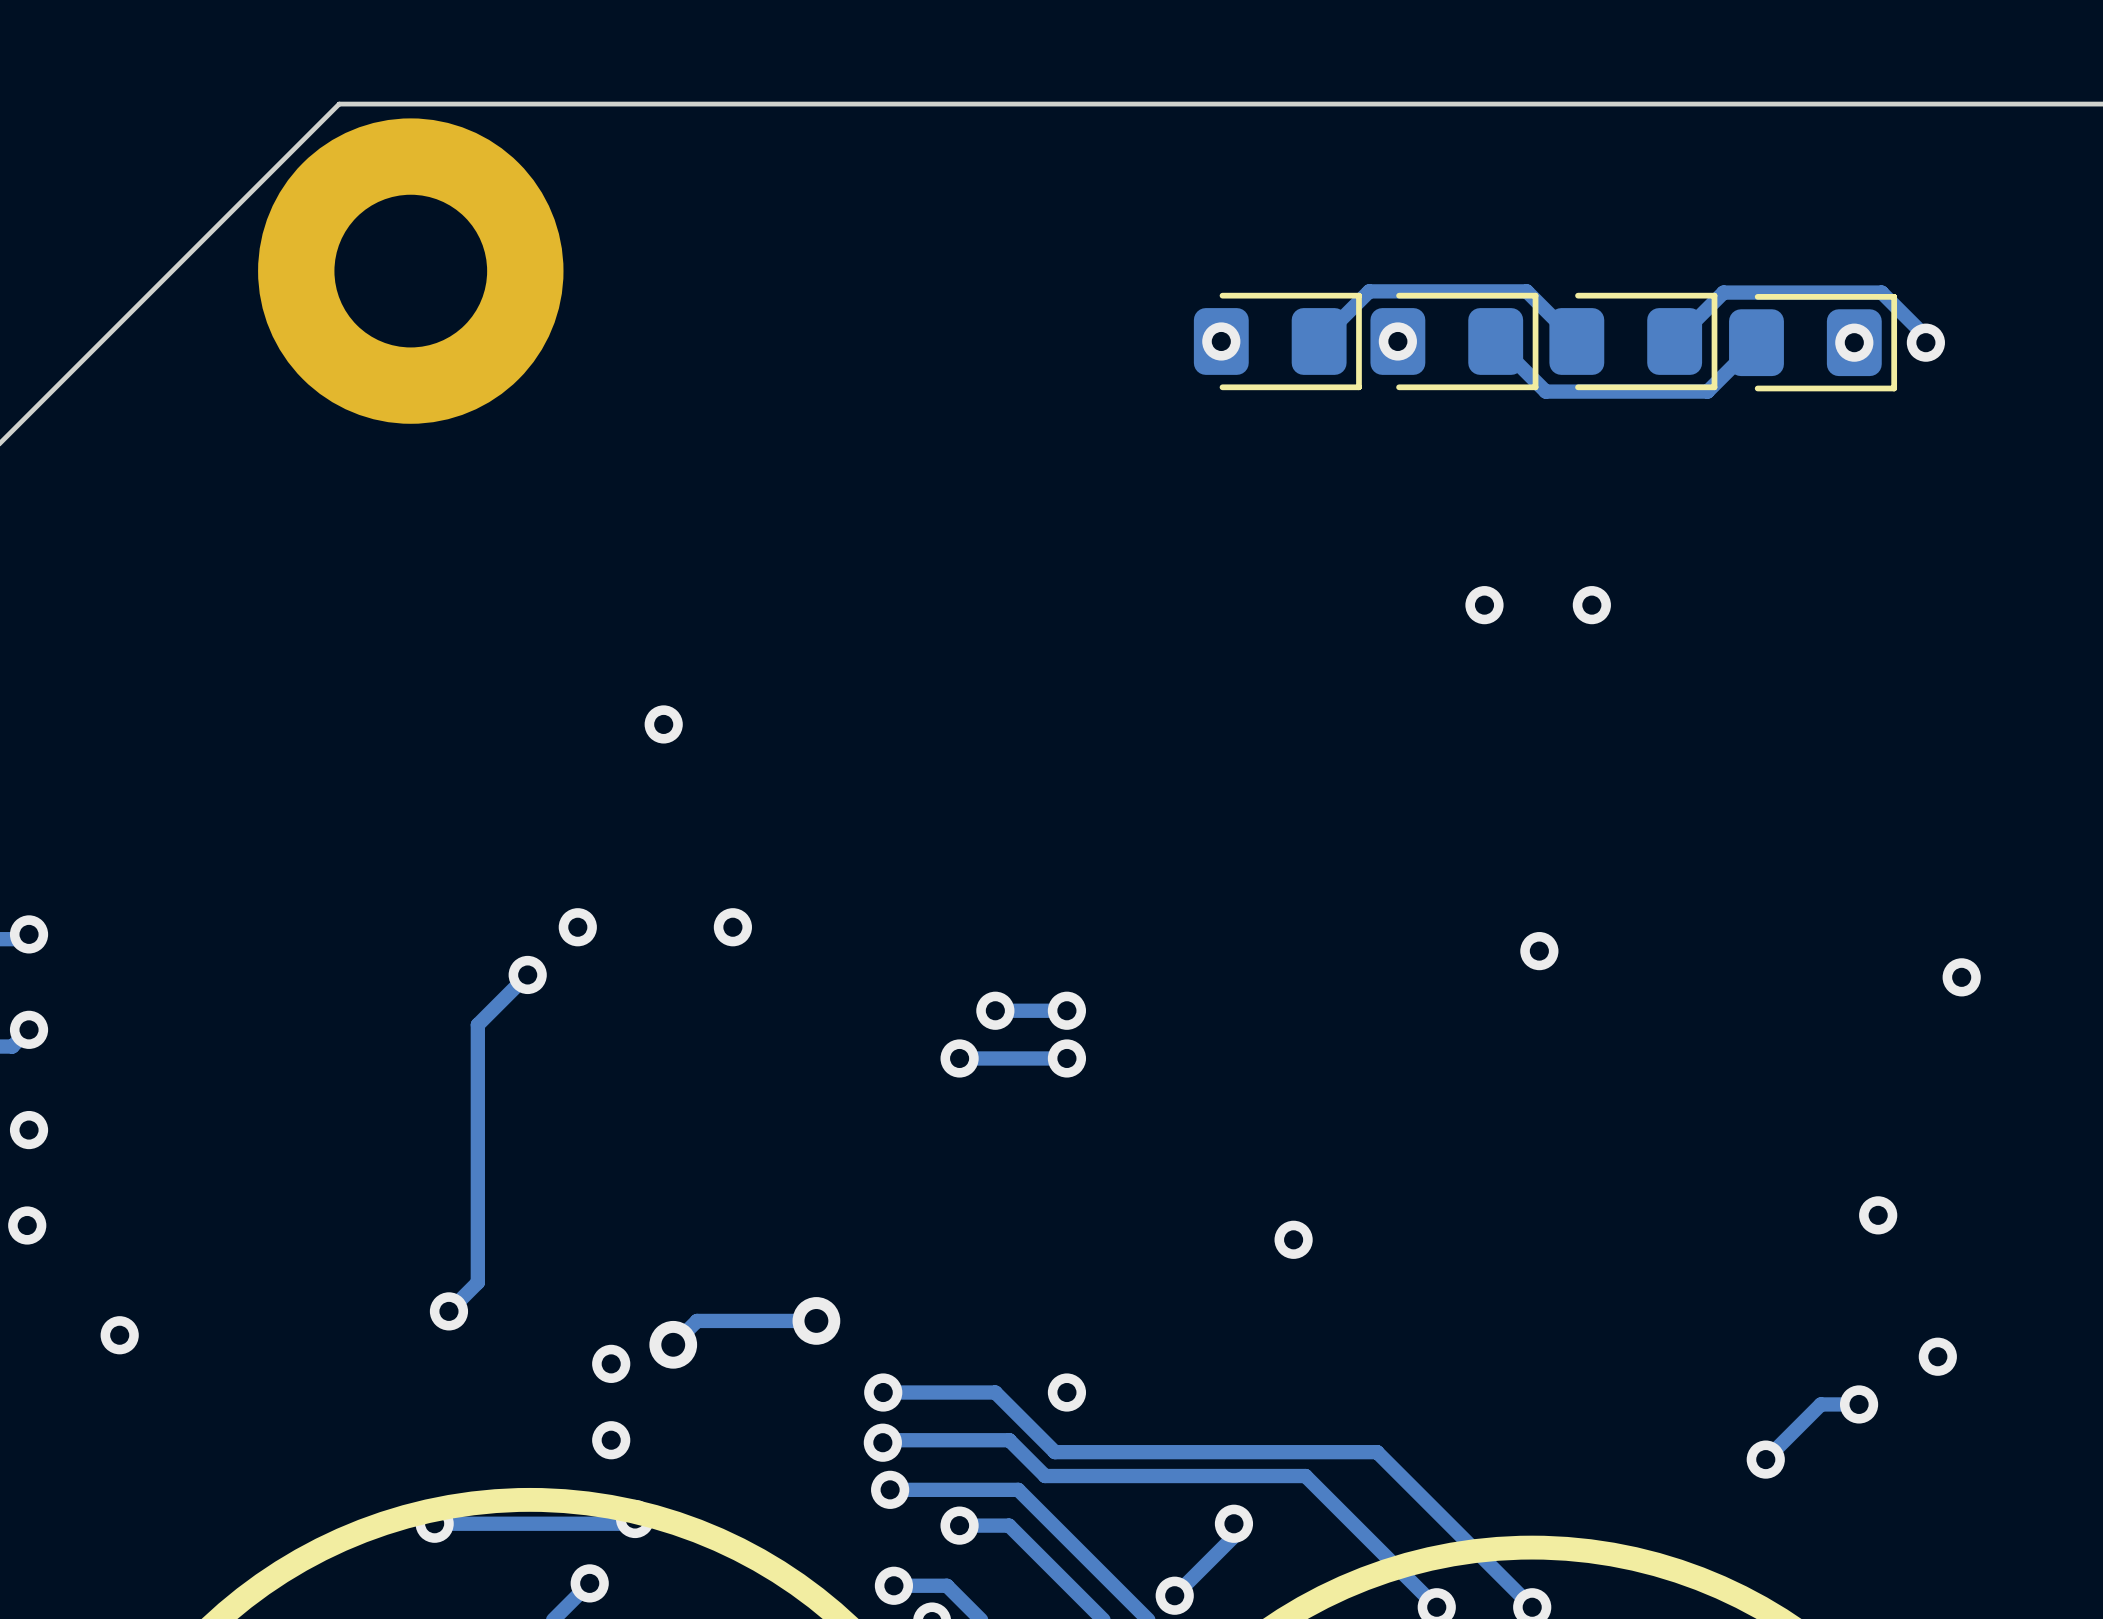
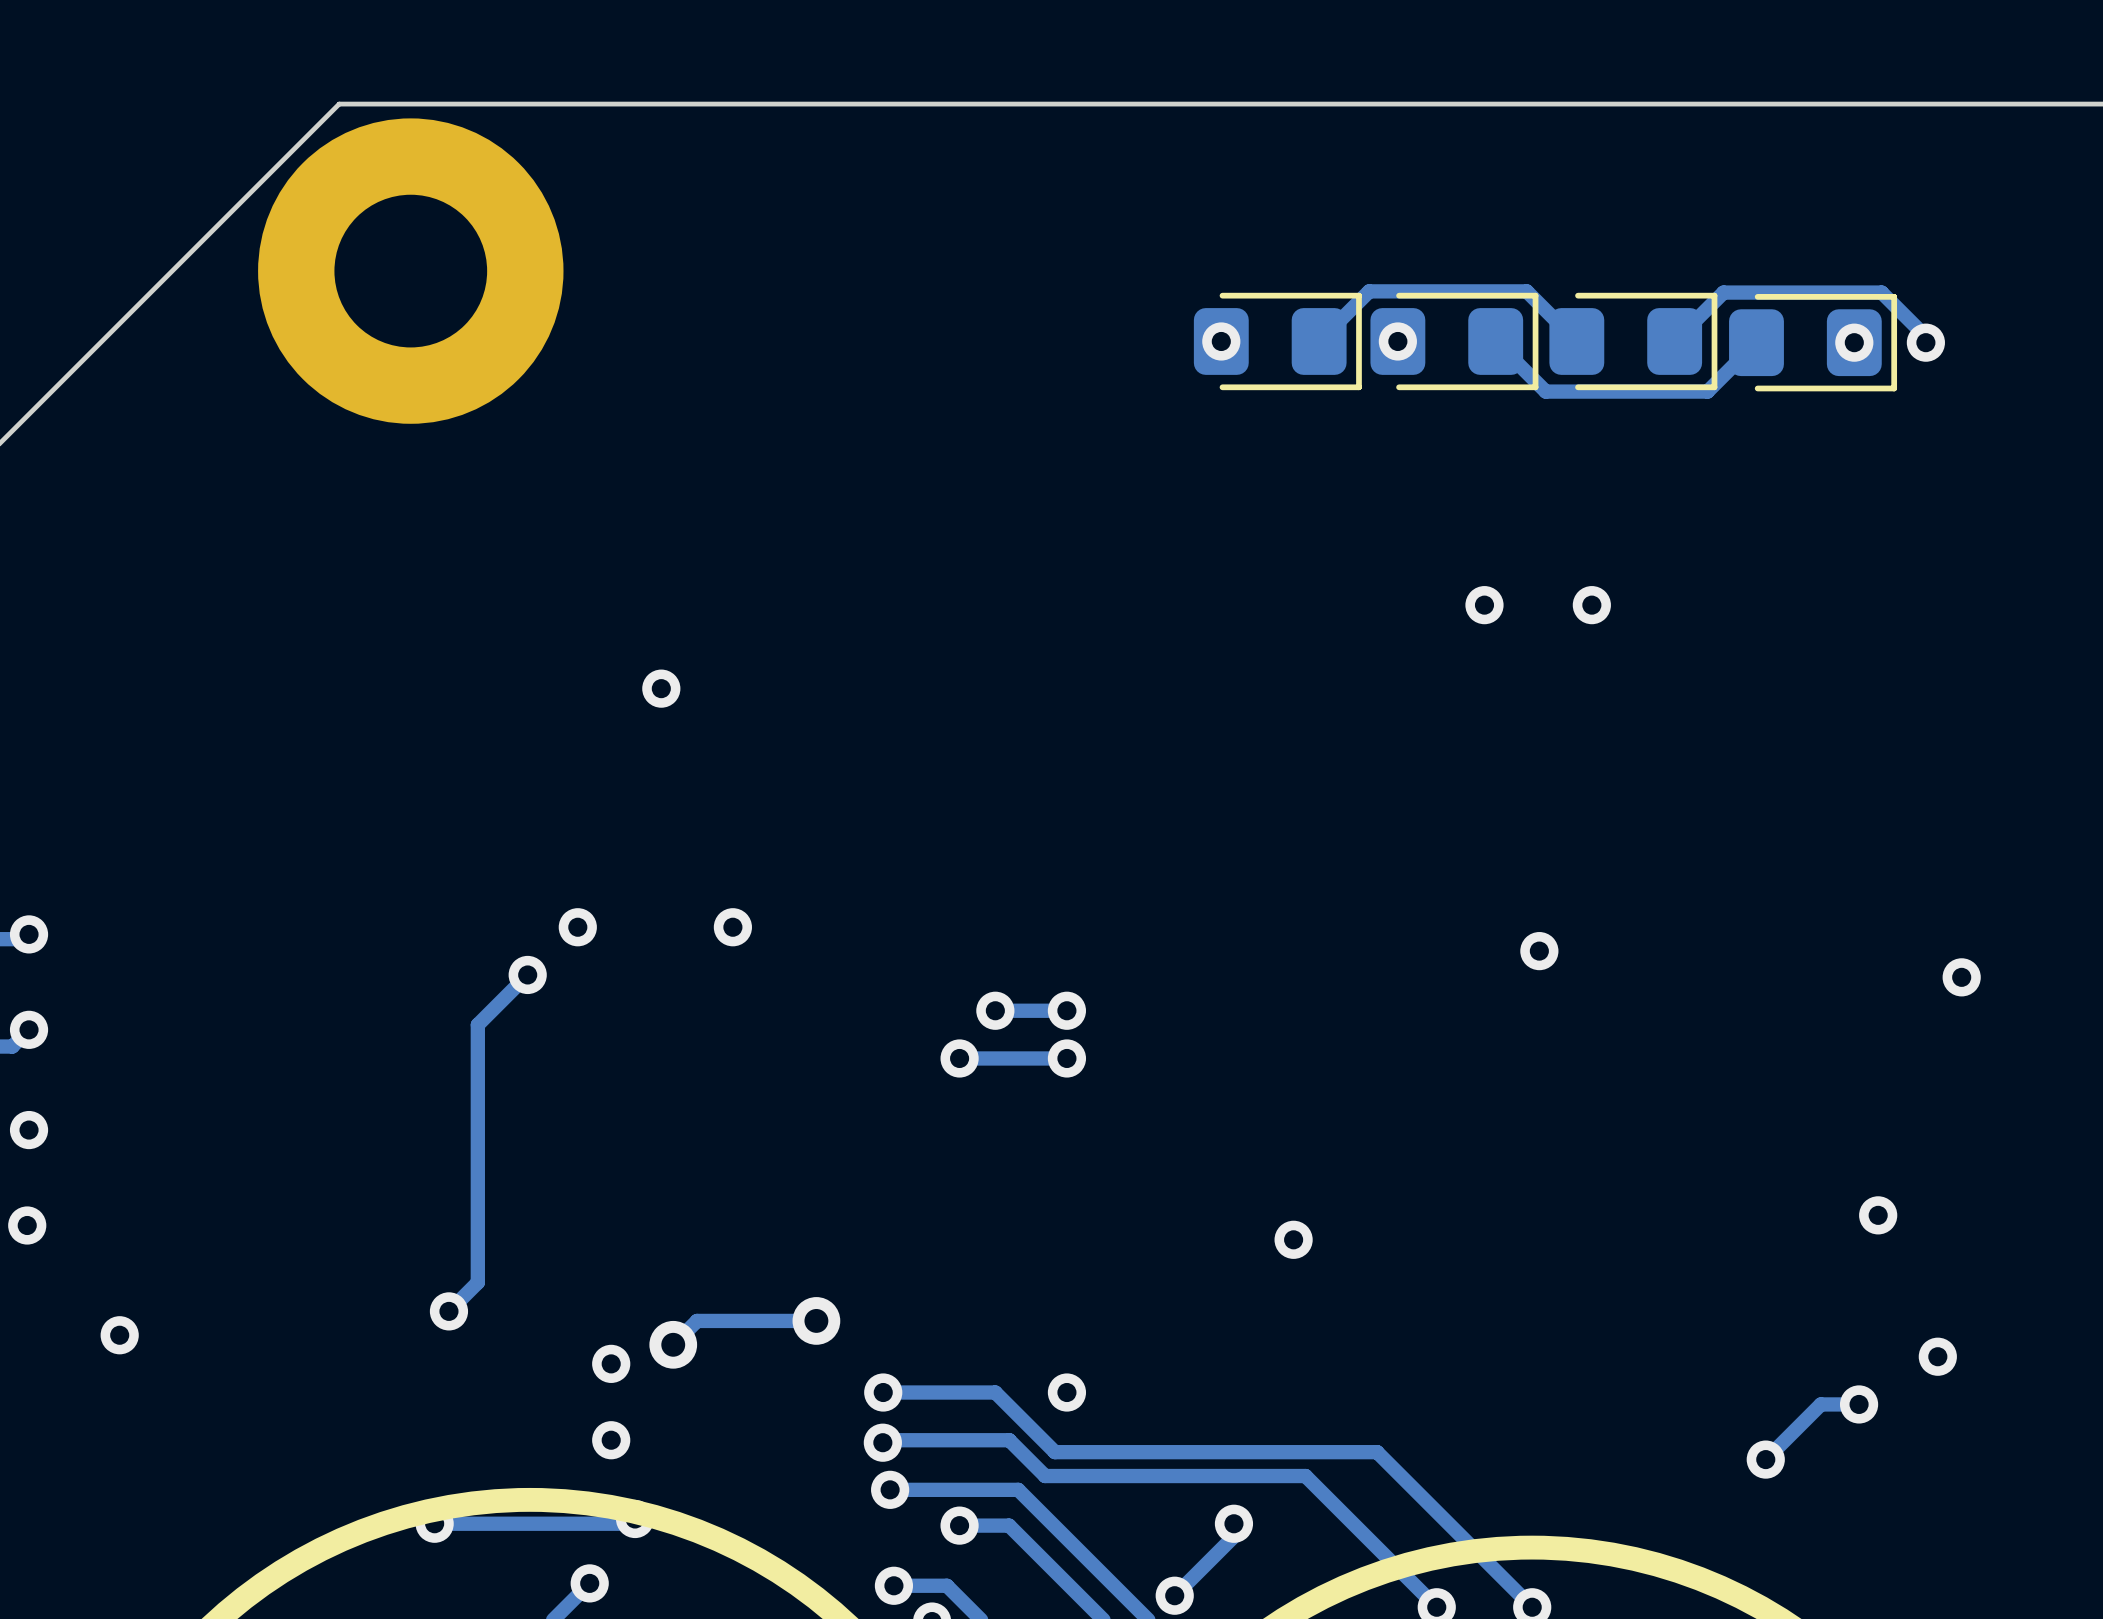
via position: (663, 724) -> (661, 688)

